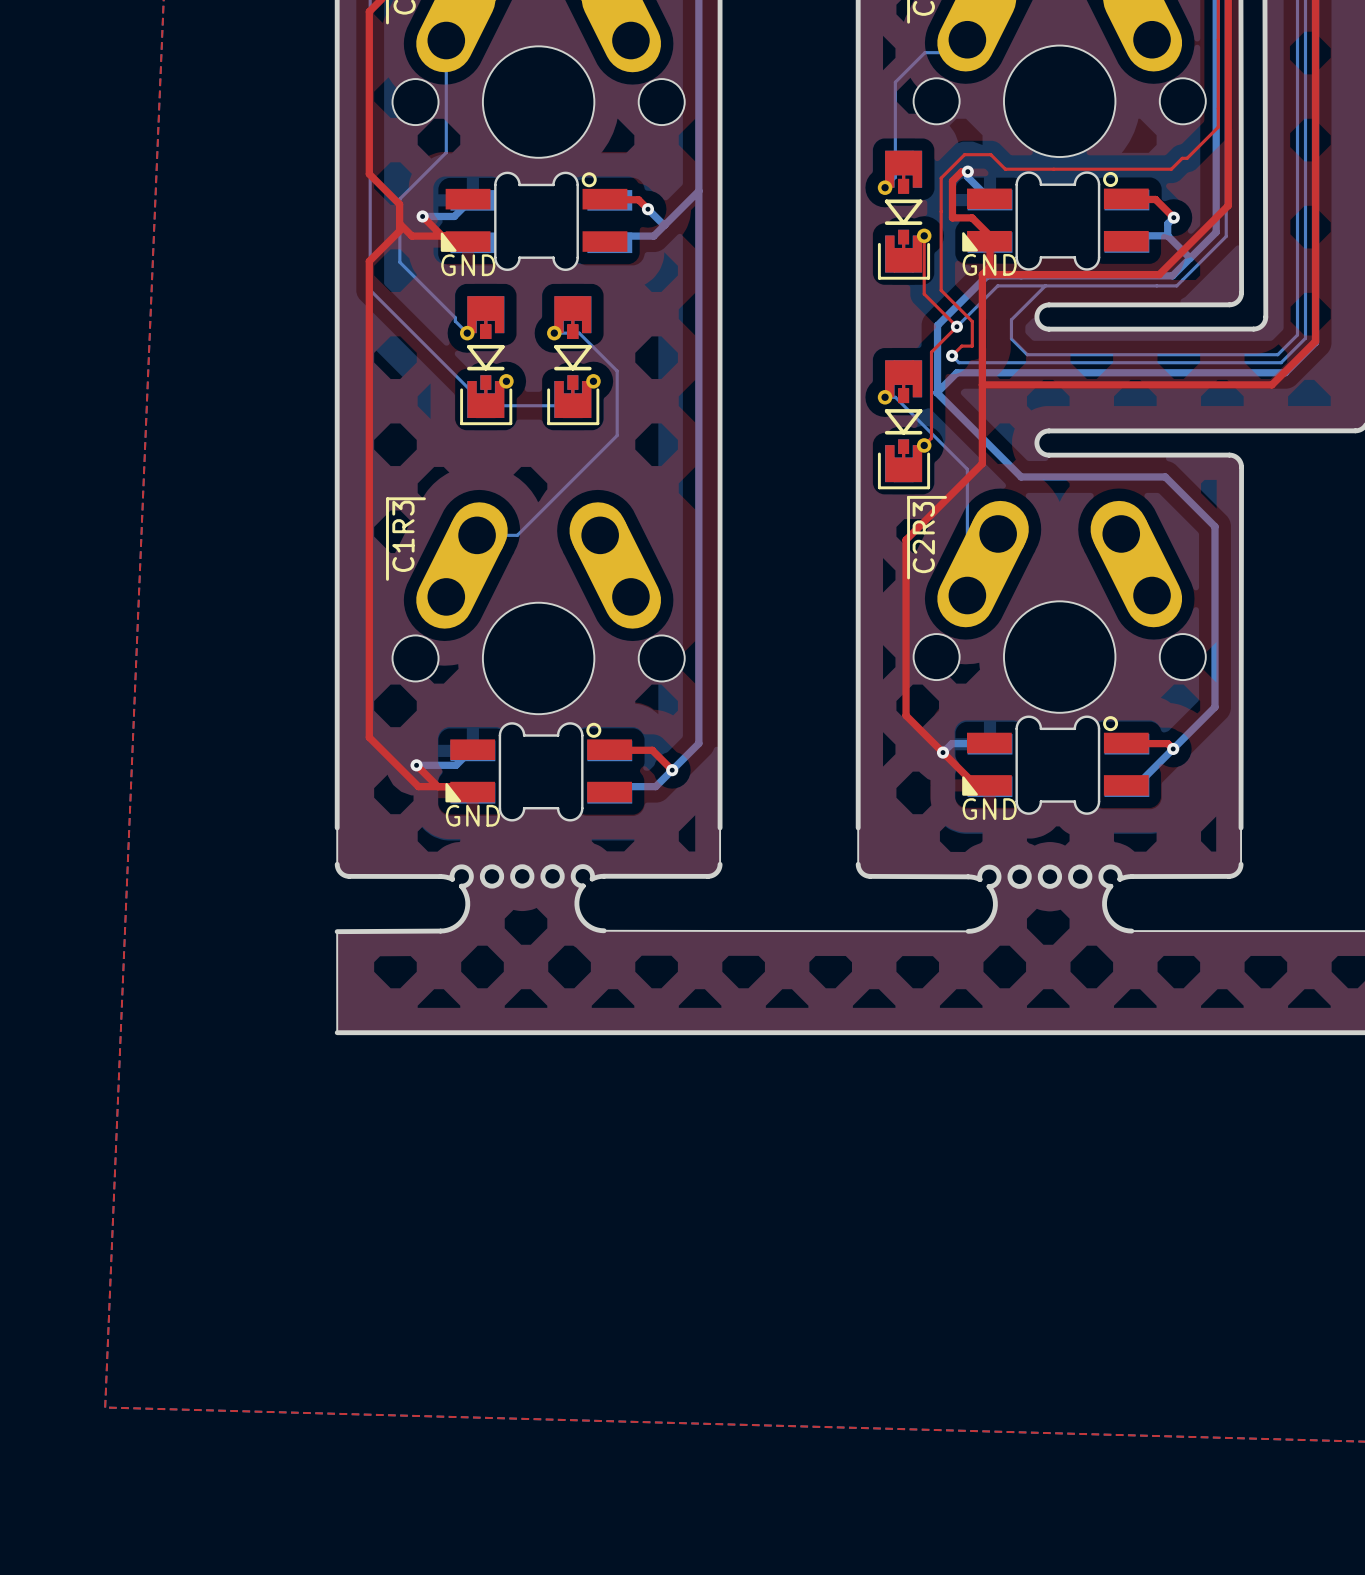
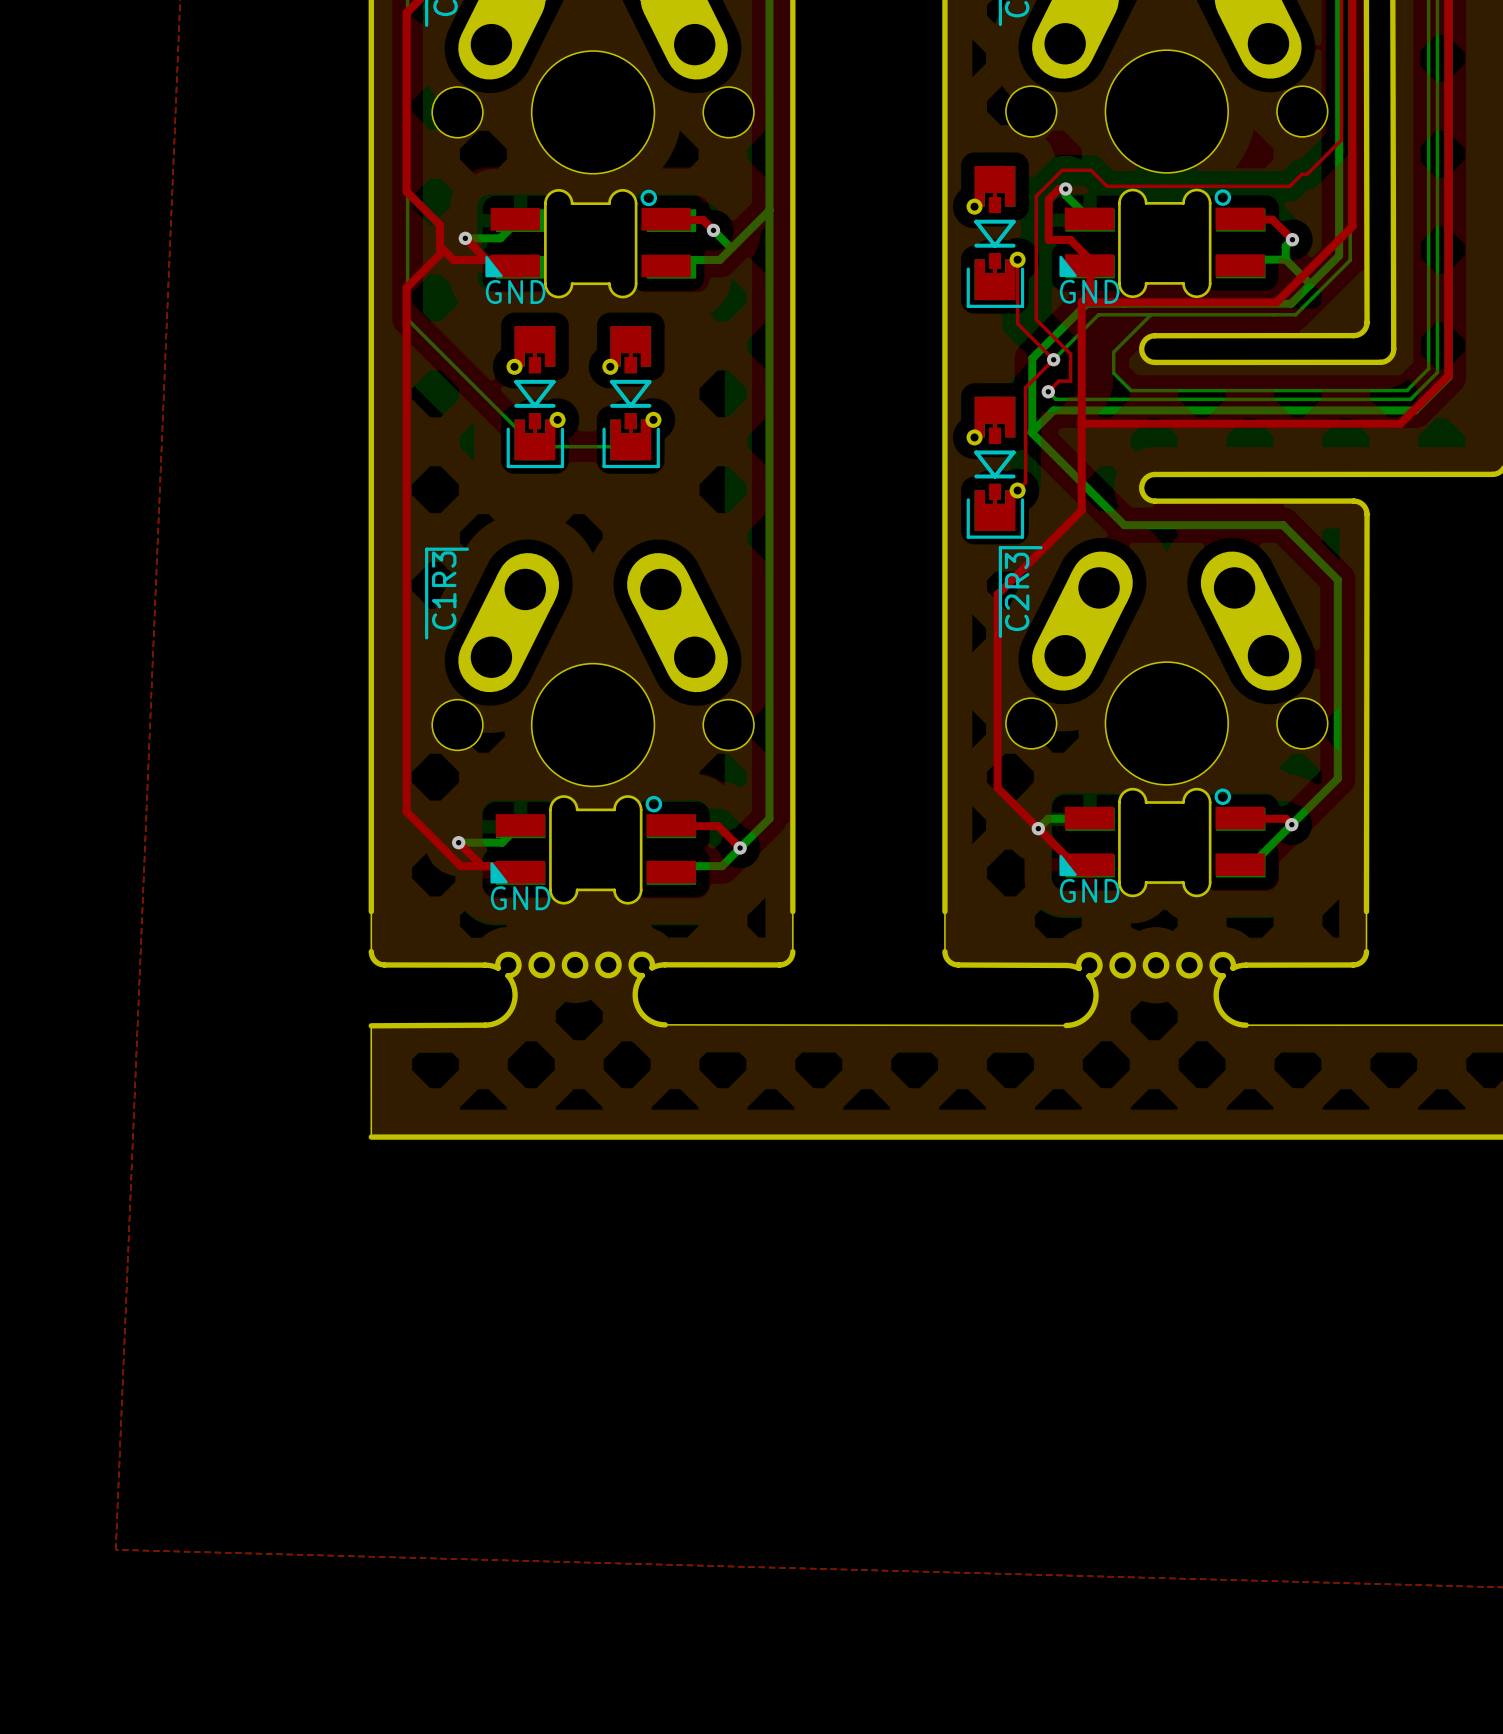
bottom track: (967, 39) (963, 39) (950, 52) (924, 52) (895, 82) (895, 177) (885, 187) -> none
bottom track: (446, 40) (446, 152) (399, 199) (399, 262) (455, 317) (455, 321) (467, 333) -> none
bottom track: (554, 333) (579, 333) (617, 371) (617, 435) (517, 535) (477, 535) -> none
bottom track: (885, 397) (895, 397) (967, 469) (967, 595) -> none

